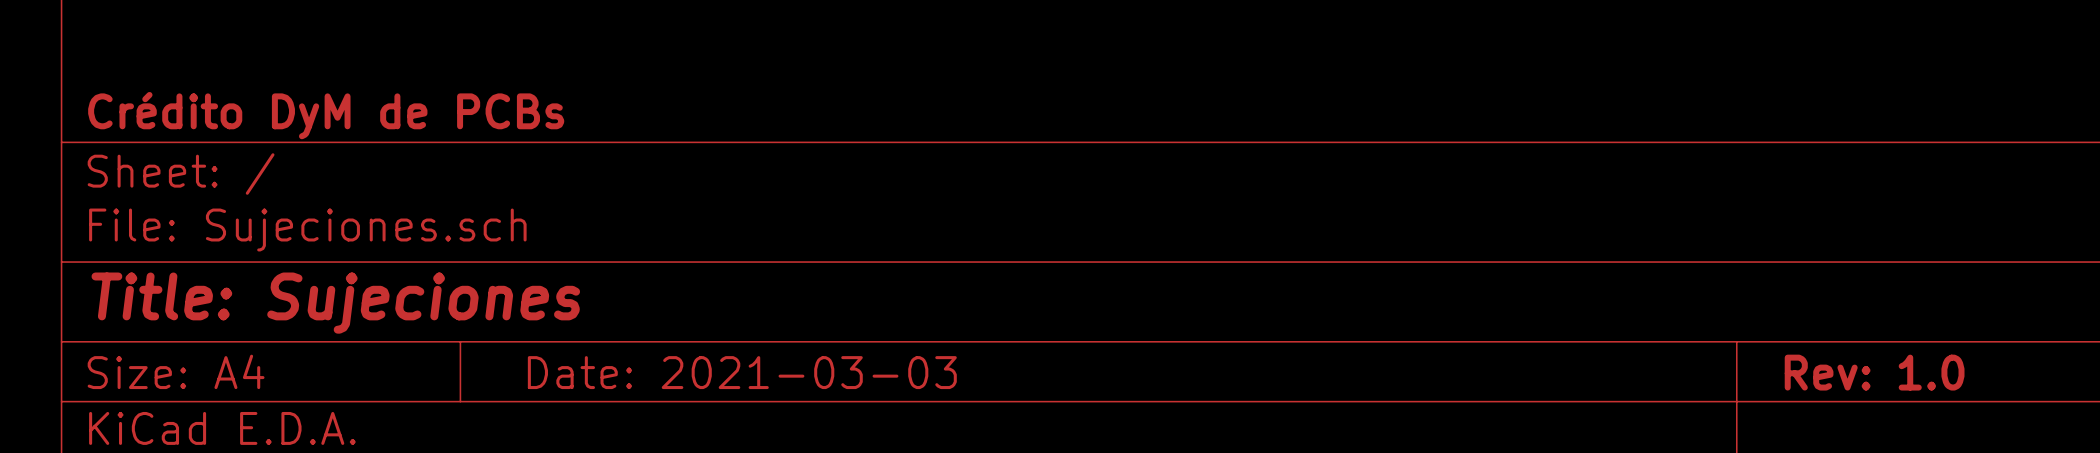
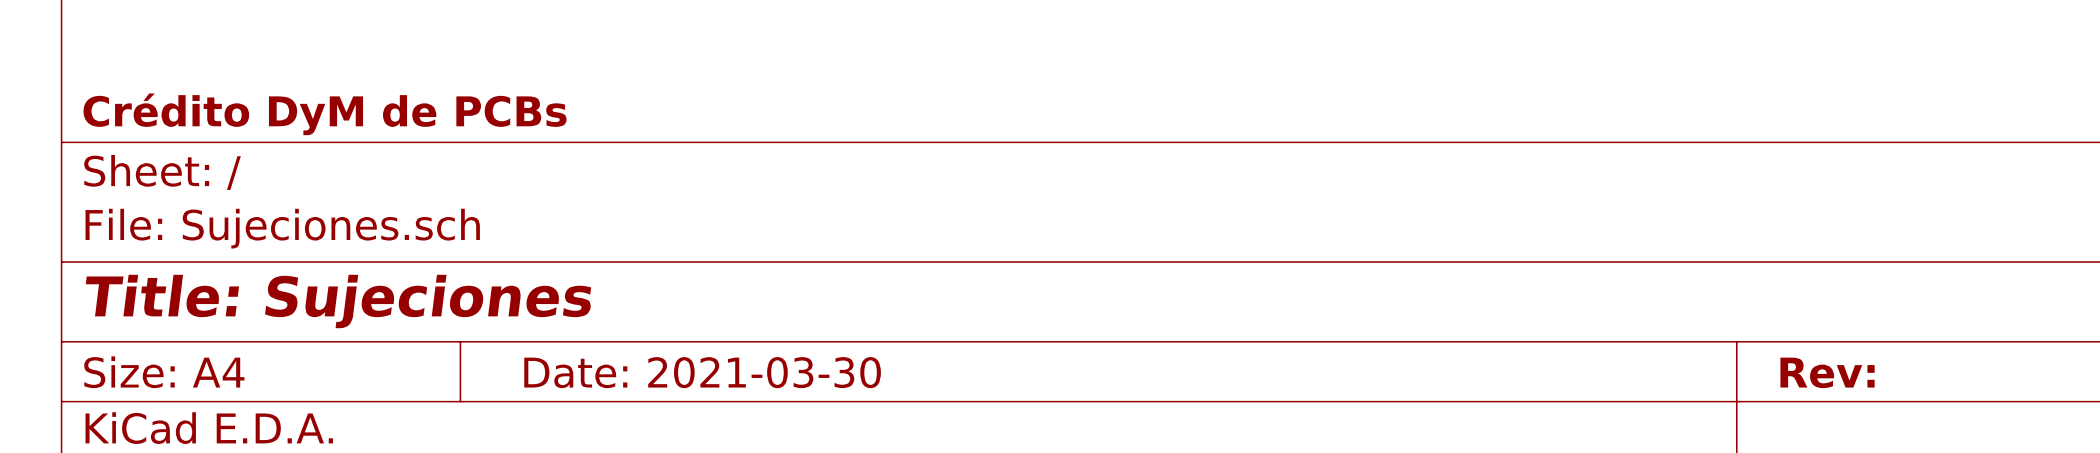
title block: Date: 2021-03-03 (742, 372) -> Date: 2021-03-30 (702, 372)
title block: Rev: 1.0 (1874, 372) -> Rev: (1827, 372)

